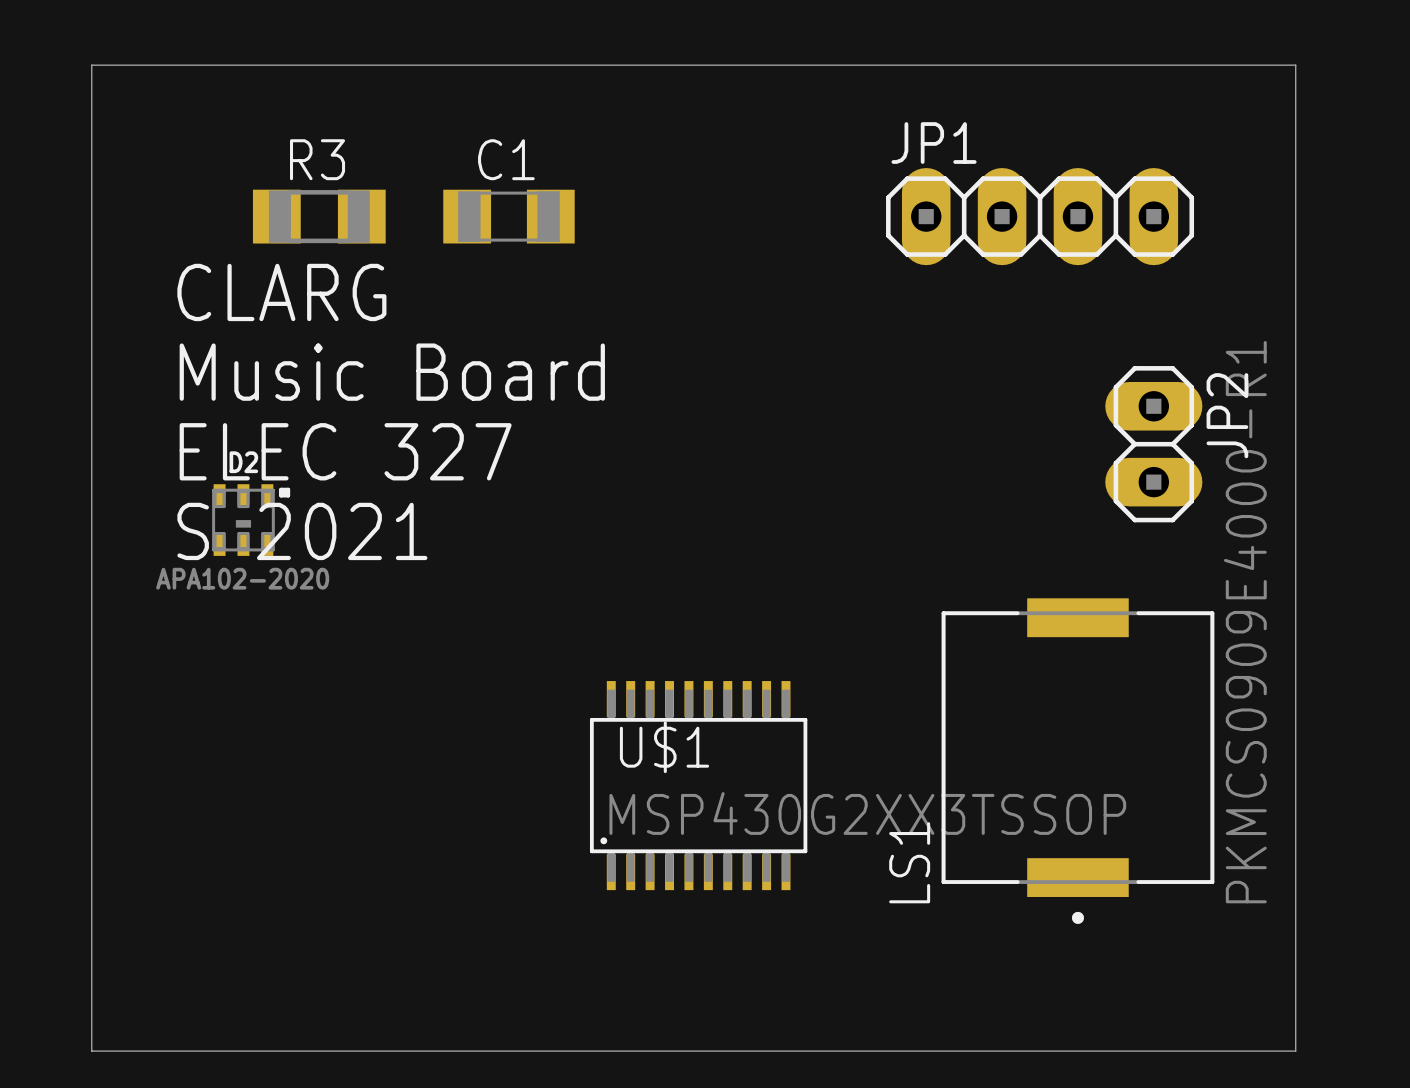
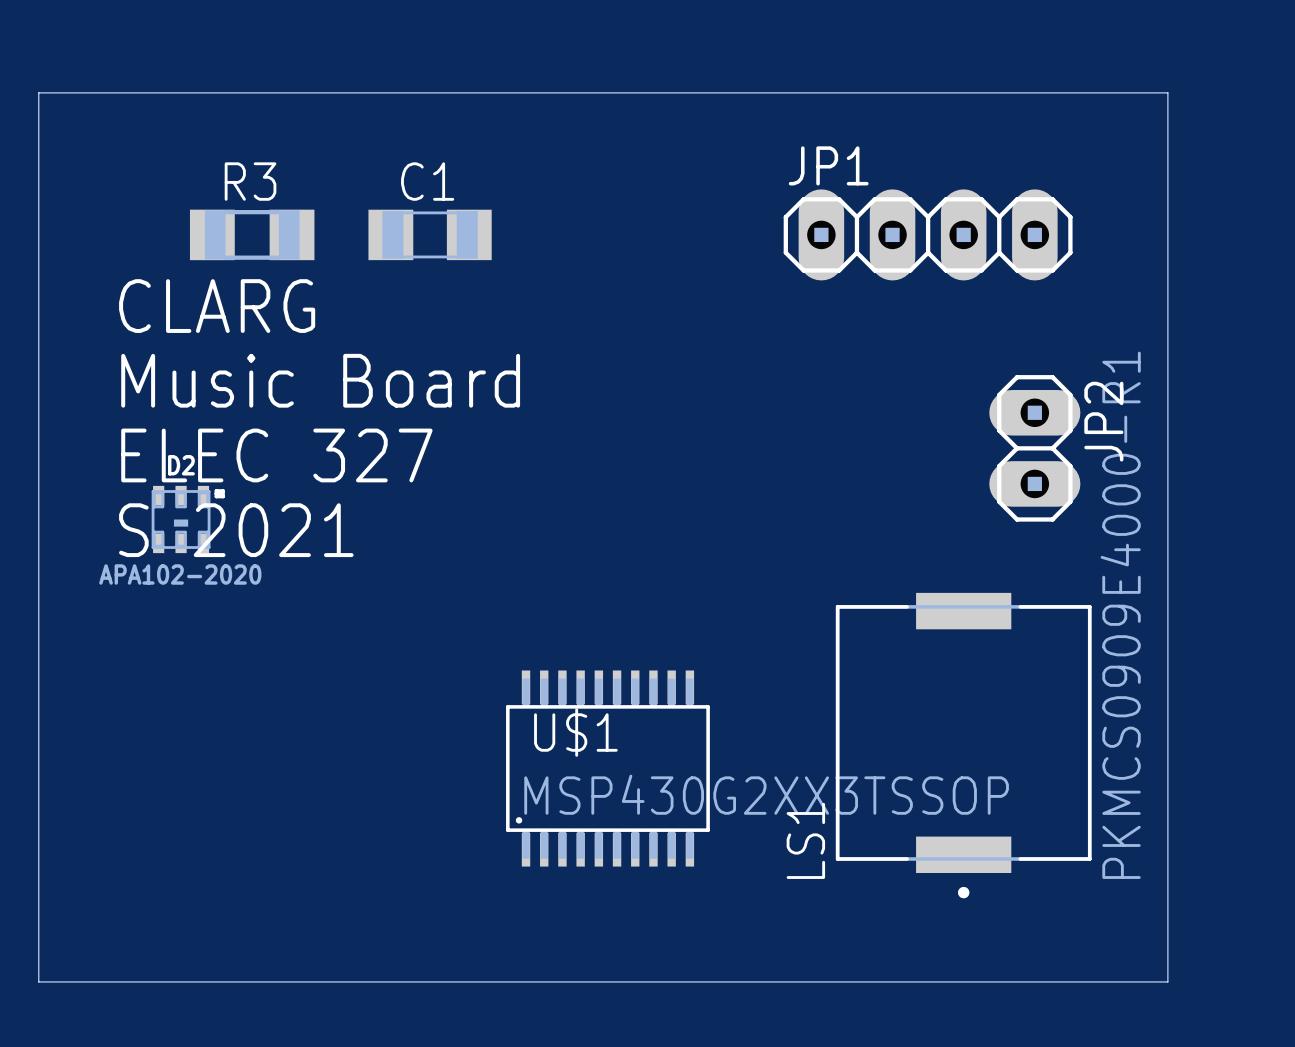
board edge: (91, 1013) (91, 1051) (1295, 1051) (1295, 1013) -> (38, 981) (1167, 981)

